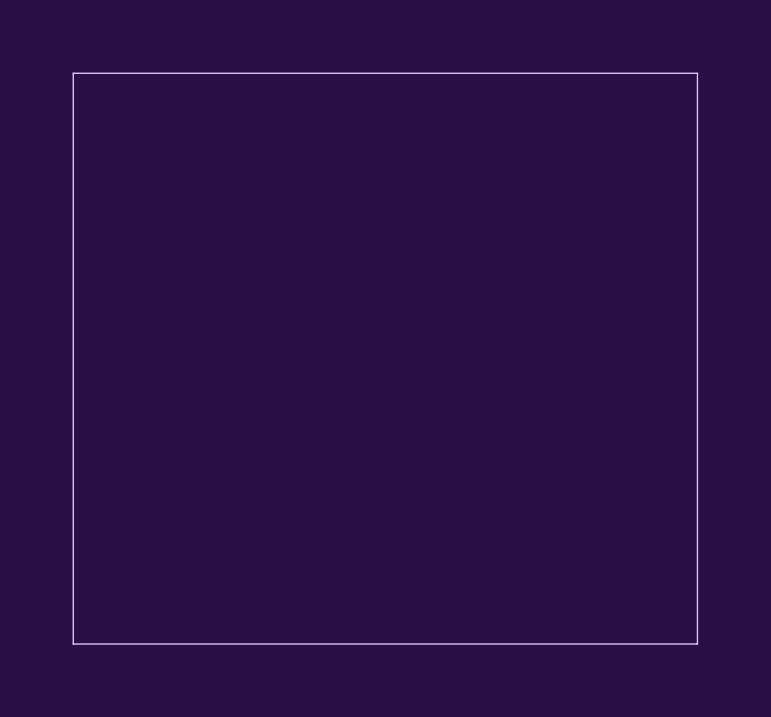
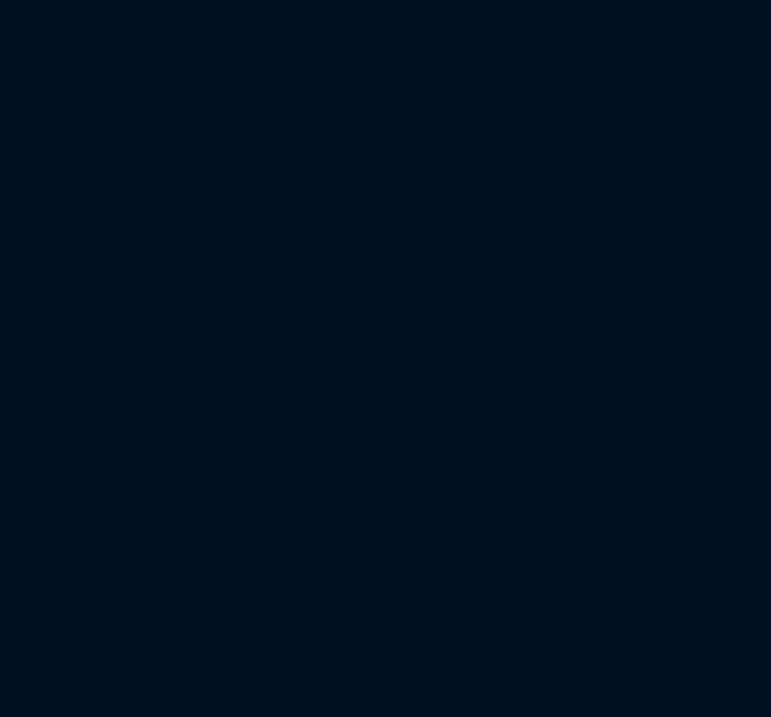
board edge: (697, 73) (73, 73) (73, 644) (697, 644) (697, 73) -> none

